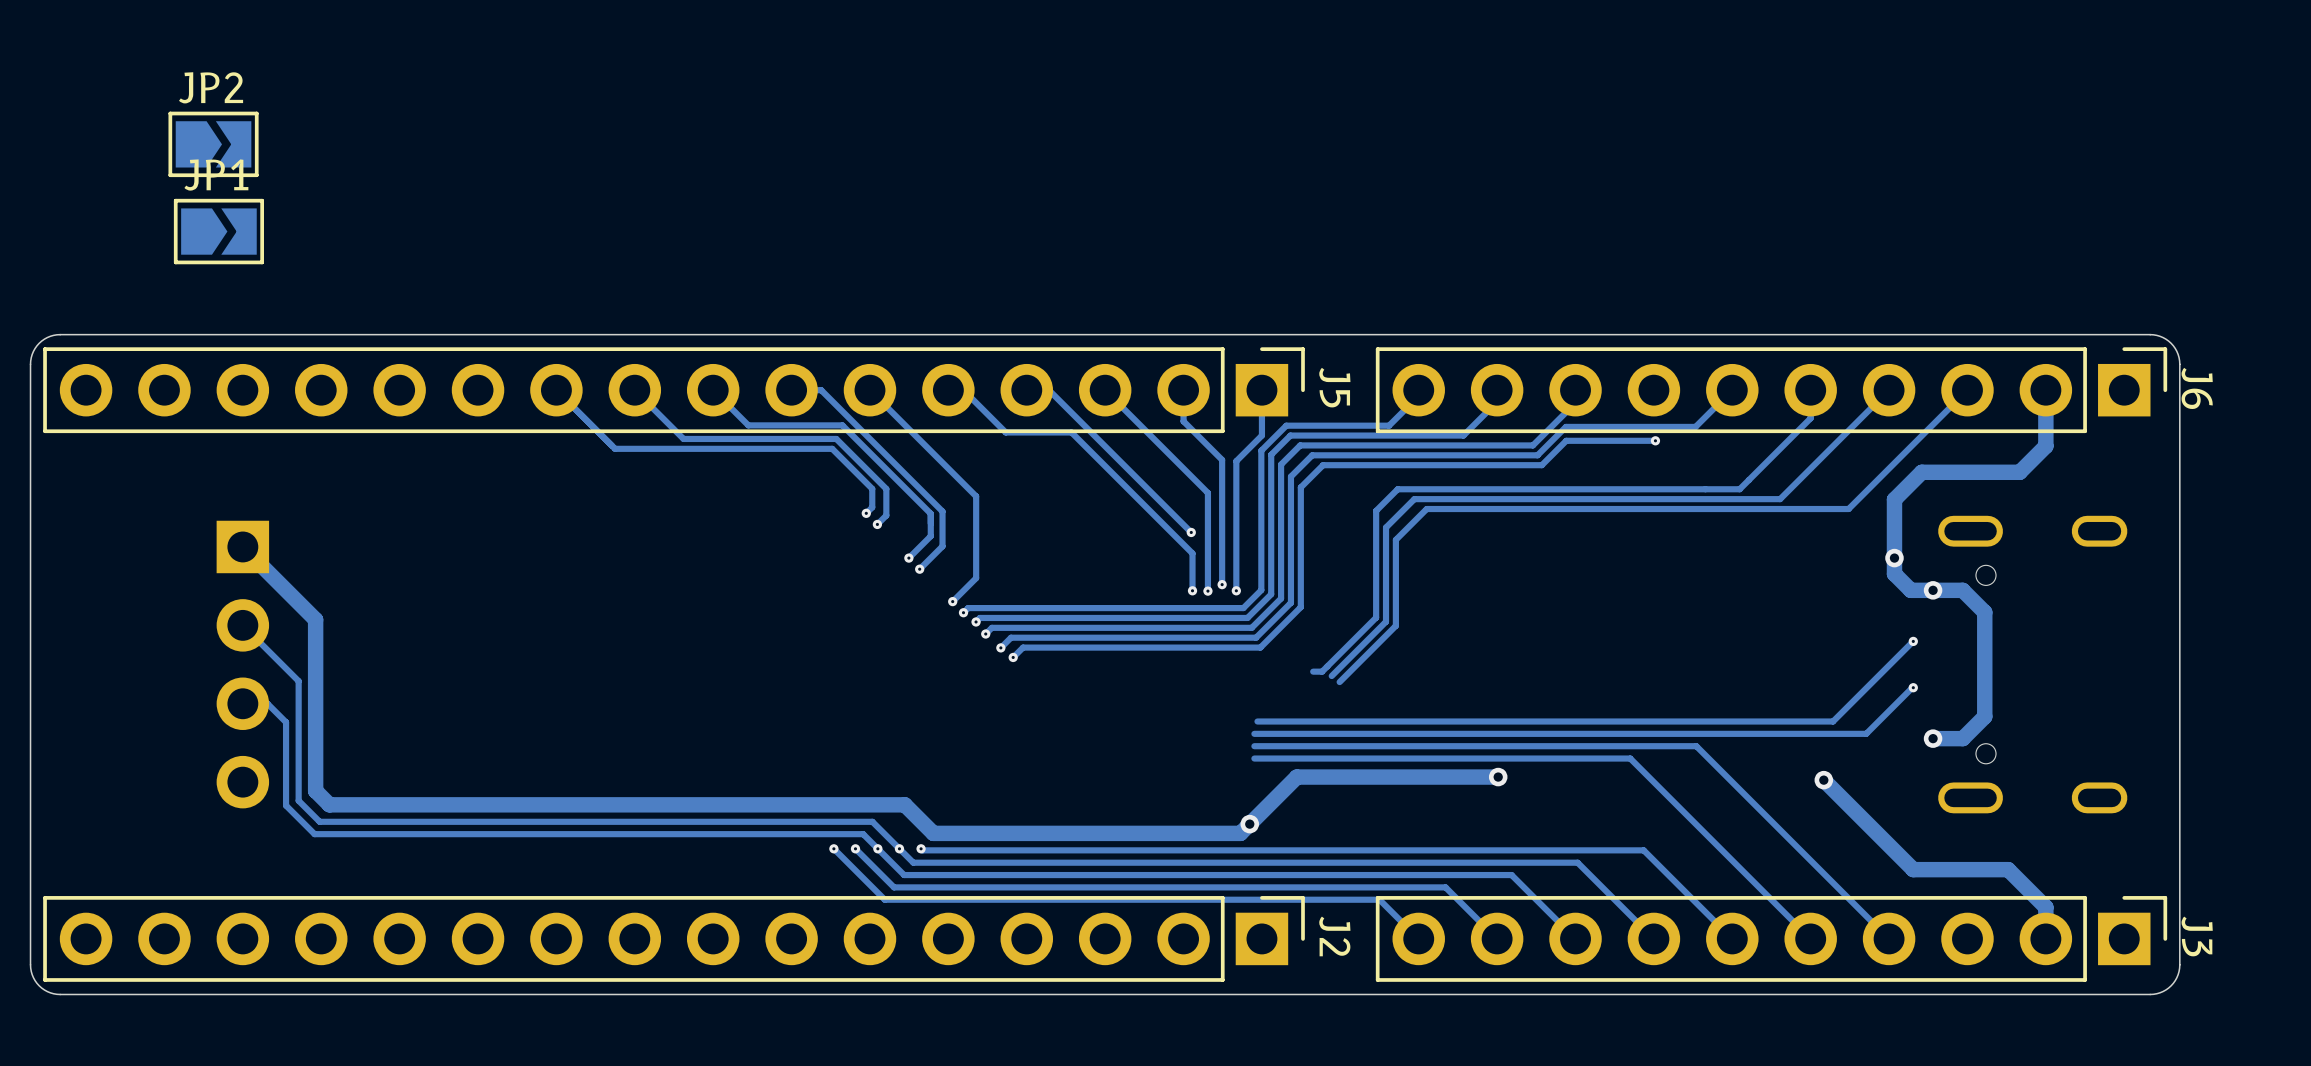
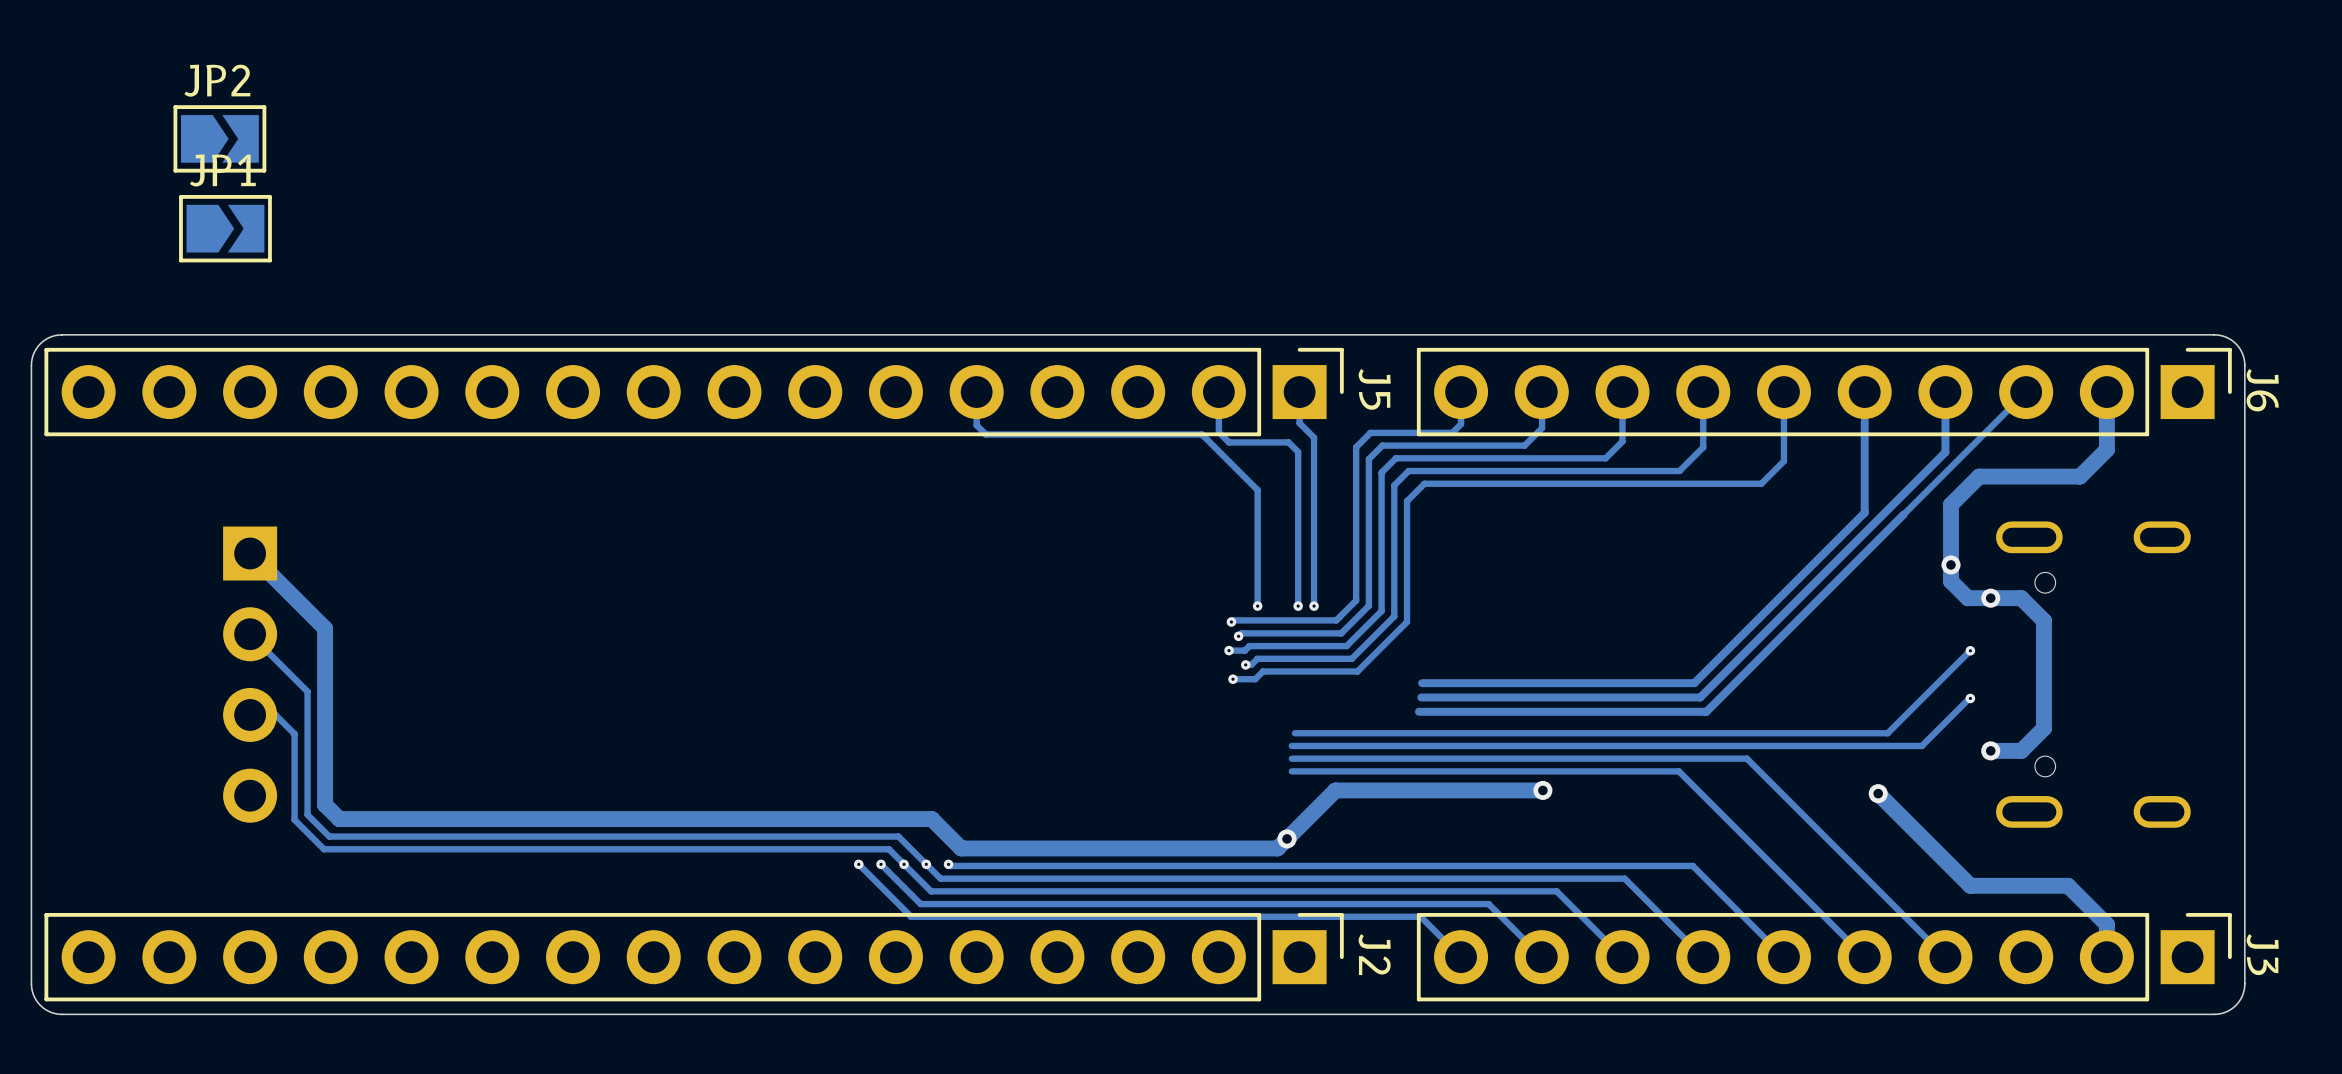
track: (556, 390) (615, 448) (832, 448) (872, 488) (872, 507) (866, 513) -> none
track: (634, 390) (683, 438) (836, 438) (886, 488) (886, 515) (877, 524) -> none
track: (713, 390) (748, 425) (842, 425) (930, 513) (930, 536) (908, 558) -> none
track: (791, 390) (821, 390) (942, 511) (942, 546) (919, 569) -> none
track: (869, 390) (976, 496) (976, 578) (952, 601) -> none
track: (948, 390) (963, 390) (1005, 432) (1071, 432) (1192, 553) (1192, 590) -> (976, 392) (976, 425) (985, 434) (1202, 434) (1257, 490) (1257, 606)
track: (1026, 390) (1048, 390) (1191, 532) -> none
track: (1105, 390) (1207, 492) (1207, 591) -> none
track: (1497, 390) (1497, 401) (1463, 435) (1290, 435) (1271, 454) (1271, 594) (1247, 617) (979, 617) (976, 621) -> (1542, 392) (1542, 428) (1524, 445) (1382, 445) (1368, 459) (1368, 605) (1341, 633) (1241, 633) (1238, 636)
track: none -> (1703, 392) (1703, 447) (1679, 471) (1408, 471) (1394, 485) (1394, 616) (1351, 658) (1257, 658) (1251, 664) (1245, 664)
track: (1732, 390) (1695, 426) (1565, 426) (1537, 455) (1312, 455) (1290, 476) (1290, 602) (1256, 637) (1011, 637) (1000, 647) -> (1783, 392) (1783, 461) (1761, 483) (1424, 483) (1407, 501) (1407, 622) (1357, 671) (1262, 671) (1255, 679) (1233, 679)
track: (1889, 390) (1780, 499) (1414, 499) (1386, 527) (1386, 621) (1331, 676) -> (1945, 392) (1945, 452) (1700, 697) (1421, 697)
track: (1418, 396) (1389, 425) (1286, 425) (1261, 450) (1261, 590) (1243, 608) (968, 608) (963, 612) -> (1461, 398) (1461, 424) (1452, 432) (1370, 432) (1356, 447) (1356, 600) (1336, 620) (1233, 620) (1231, 622)
track: (1575, 402) (1532, 445) (1300, 445) (1281, 464) (1281, 598) (1251, 627) (991, 627) (985, 634) -> (1622, 405) (1622, 441) (1605, 458) (1395, 458) (1381, 472) (1381, 611) (1346, 646) (1249, 646) (1244, 650) (1229, 650)
track: (1810, 418) (1739, 489) (1397, 489) (1376, 510) (1376, 617) (1322, 671) (1313, 671) -> (1864, 420) (1864, 512) (1694, 683) (1422, 683)
track: (1261, 420) (1261, 435) (1236, 461) (1236, 590) -> (1299, 423) (1314, 437) (1314, 606)
track: (1183, 421) (1222, 459) (1222, 584) -> (1218, 424) (1218, 432) (1229, 442) (1288, 442) (1298, 451) (1298, 606)
track: (1655, 440) (1566, 440) (1541, 465) (1323, 465) (1300, 487) (1300, 607) (1260, 647) (1023, 647) (1013, 657) -> none
via: (1655, 440) -> none
track: (1848, 509) (1426, 509) (1395, 539) (1395, 625) (1339, 682) -> (1903, 514) (1706, 711) (1418, 711)
via: (866, 513) -> none
via: (877, 524) -> none
via: (1191, 532) -> none
via: (908, 558) -> none
via: (919, 569) -> none
via: (1222, 584) -> none
via: (1192, 590) -> none
via: (1236, 590) -> none
via: (1207, 591) -> none
via: none -> (1257, 606)
via: none -> (1298, 606)
via: none -> (1314, 606)
via: (952, 601) -> none
via: (963, 612) -> none
via: none -> (1231, 622)
via: (976, 621) -> none
via: none -> (1238, 636)
via: (985, 634) -> none
via: none -> (1229, 650)
via: (1000, 647) -> none
via: none -> (1245, 664)
via: (1013, 657) -> none
via: none -> (1233, 679)

